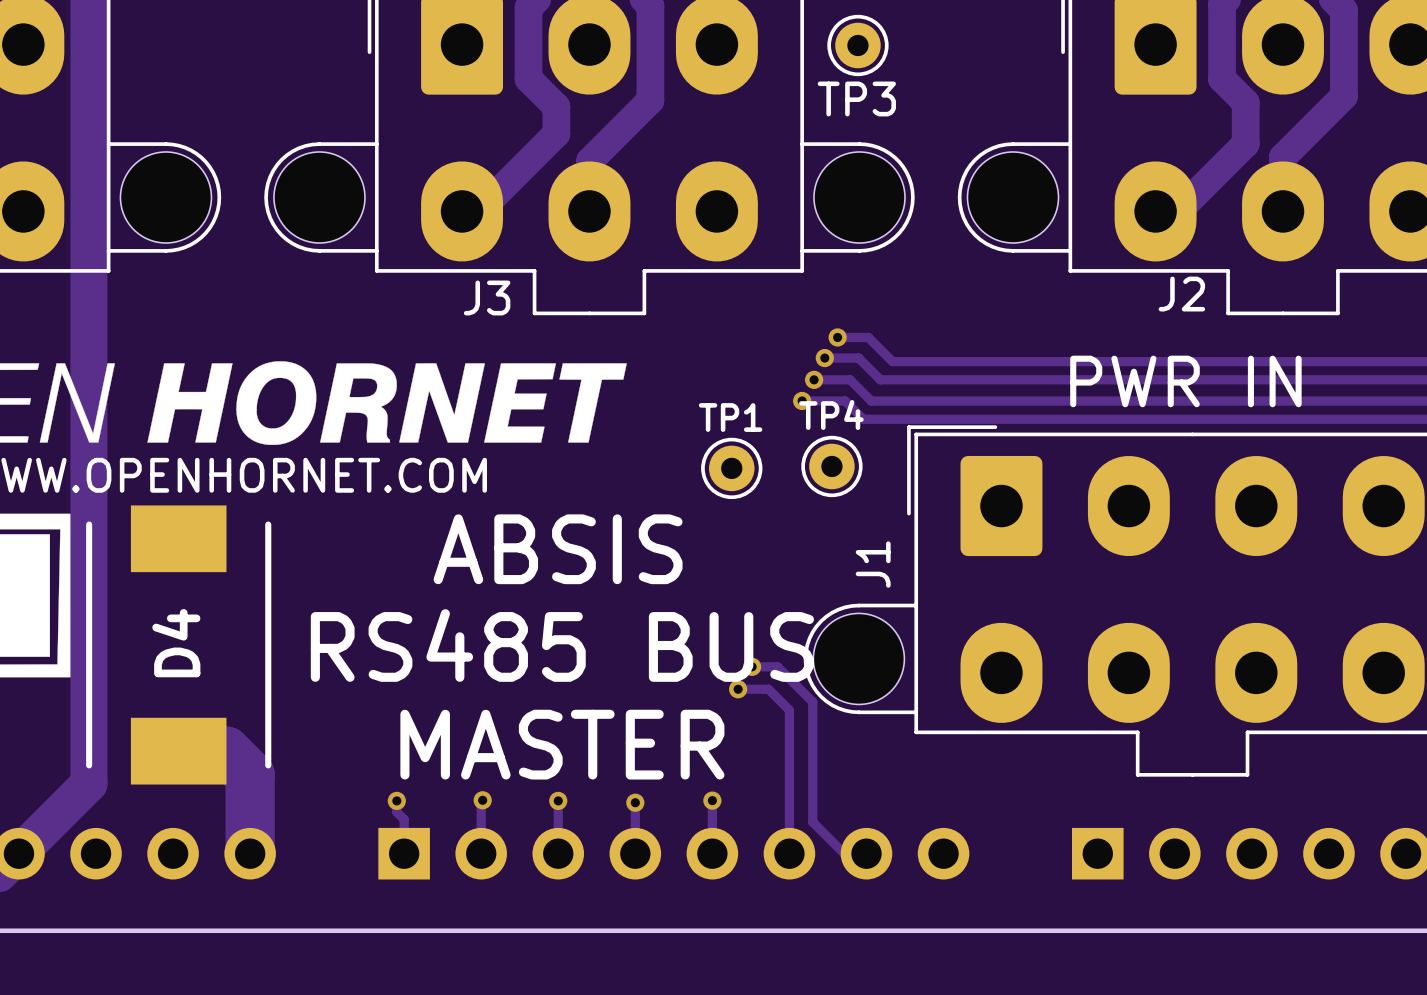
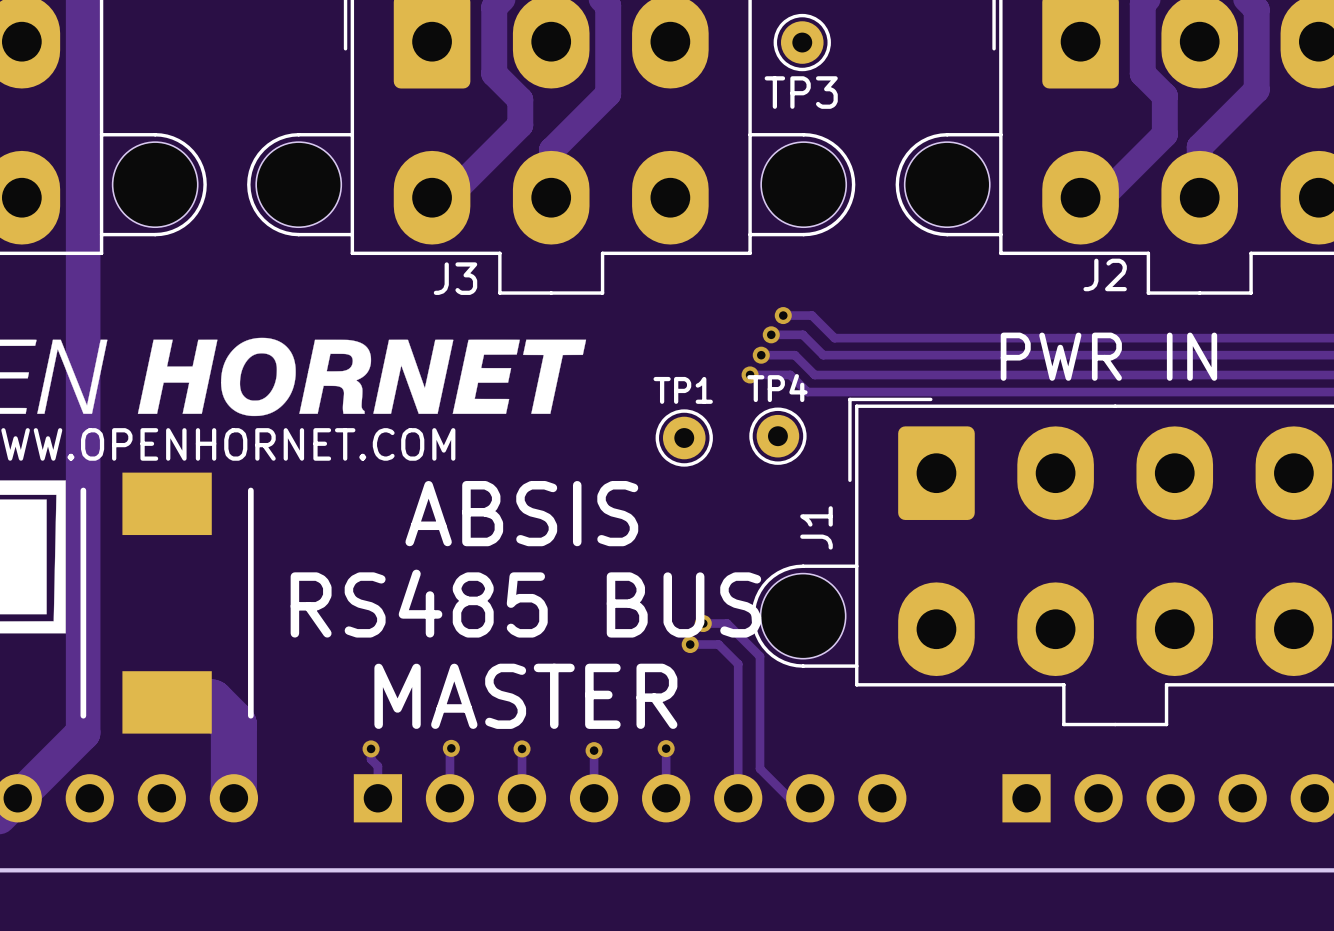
D4 name: D4 (176, 643) -> none

